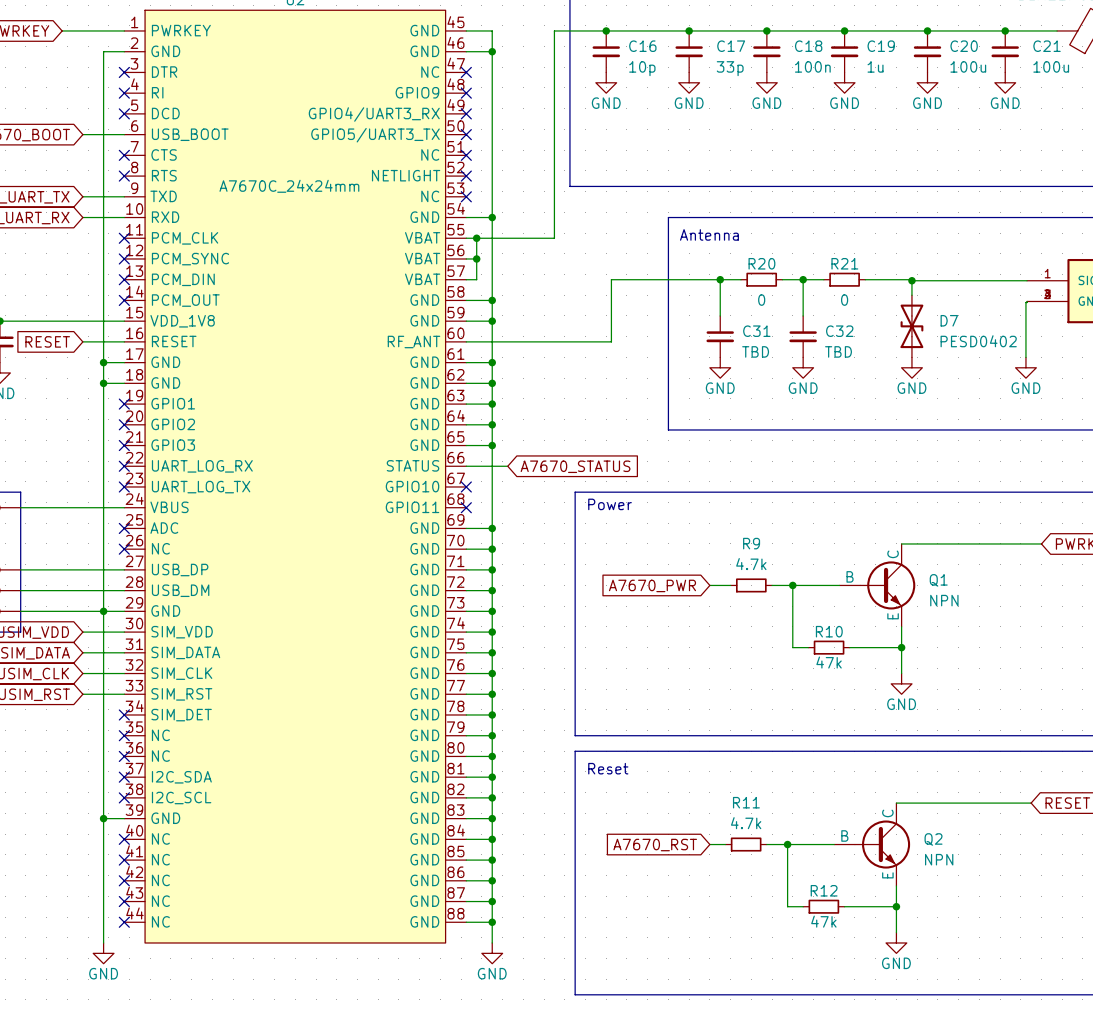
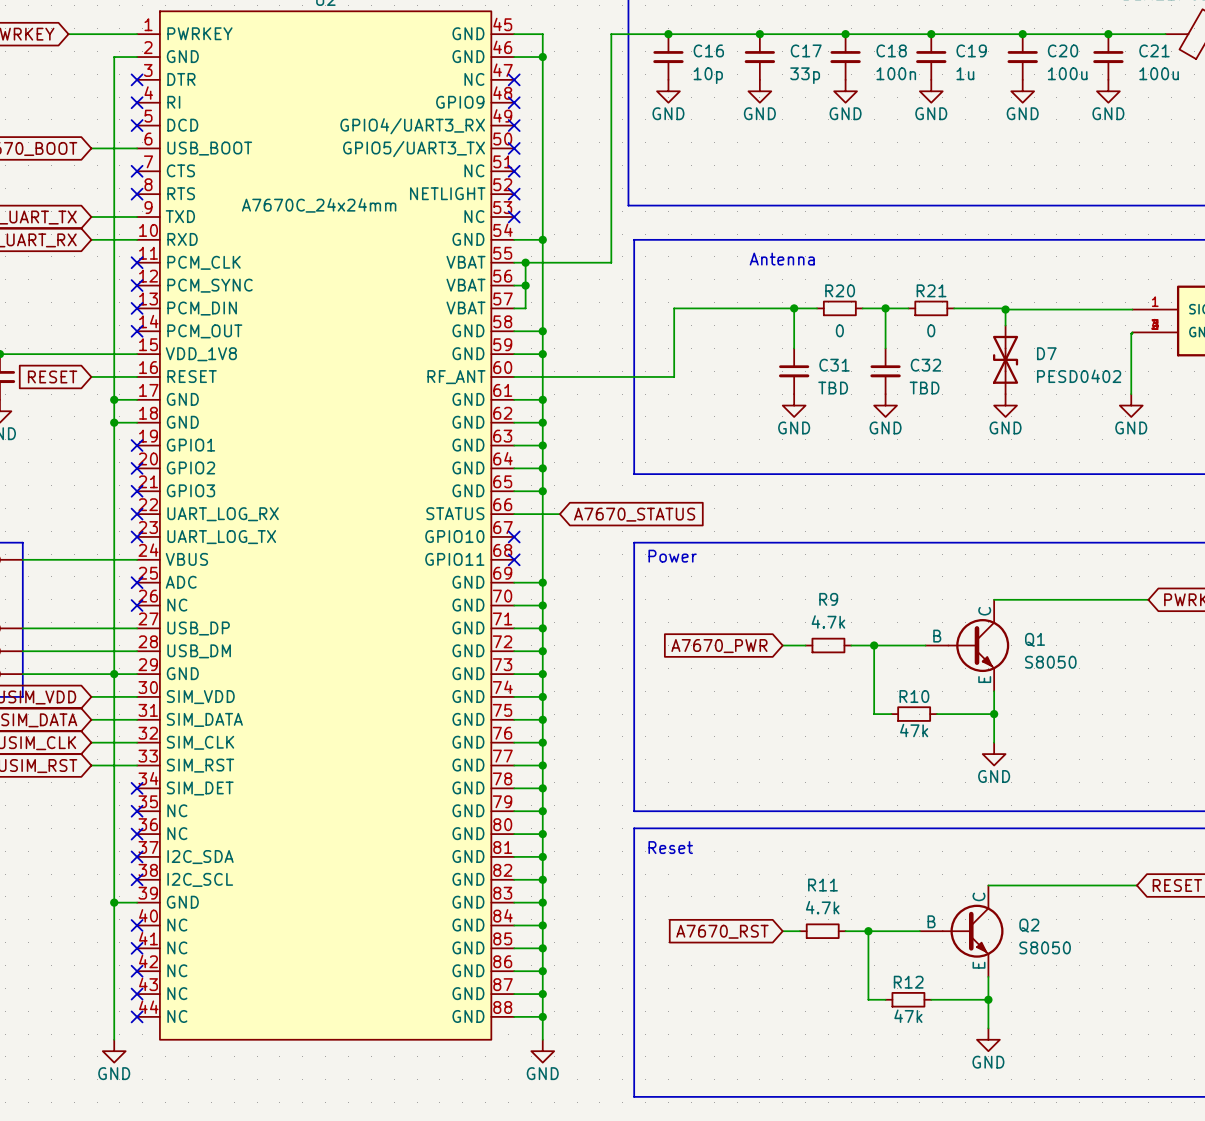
line: (668, 217) (668, 429) -> (737, 239) (634, 239) (634, 474) (737, 474)
Q1 value: NPN (944, 600) -> S8050 (1050, 662)
Q2 value: NPN (939, 859) -> S8050 (1045, 947)

